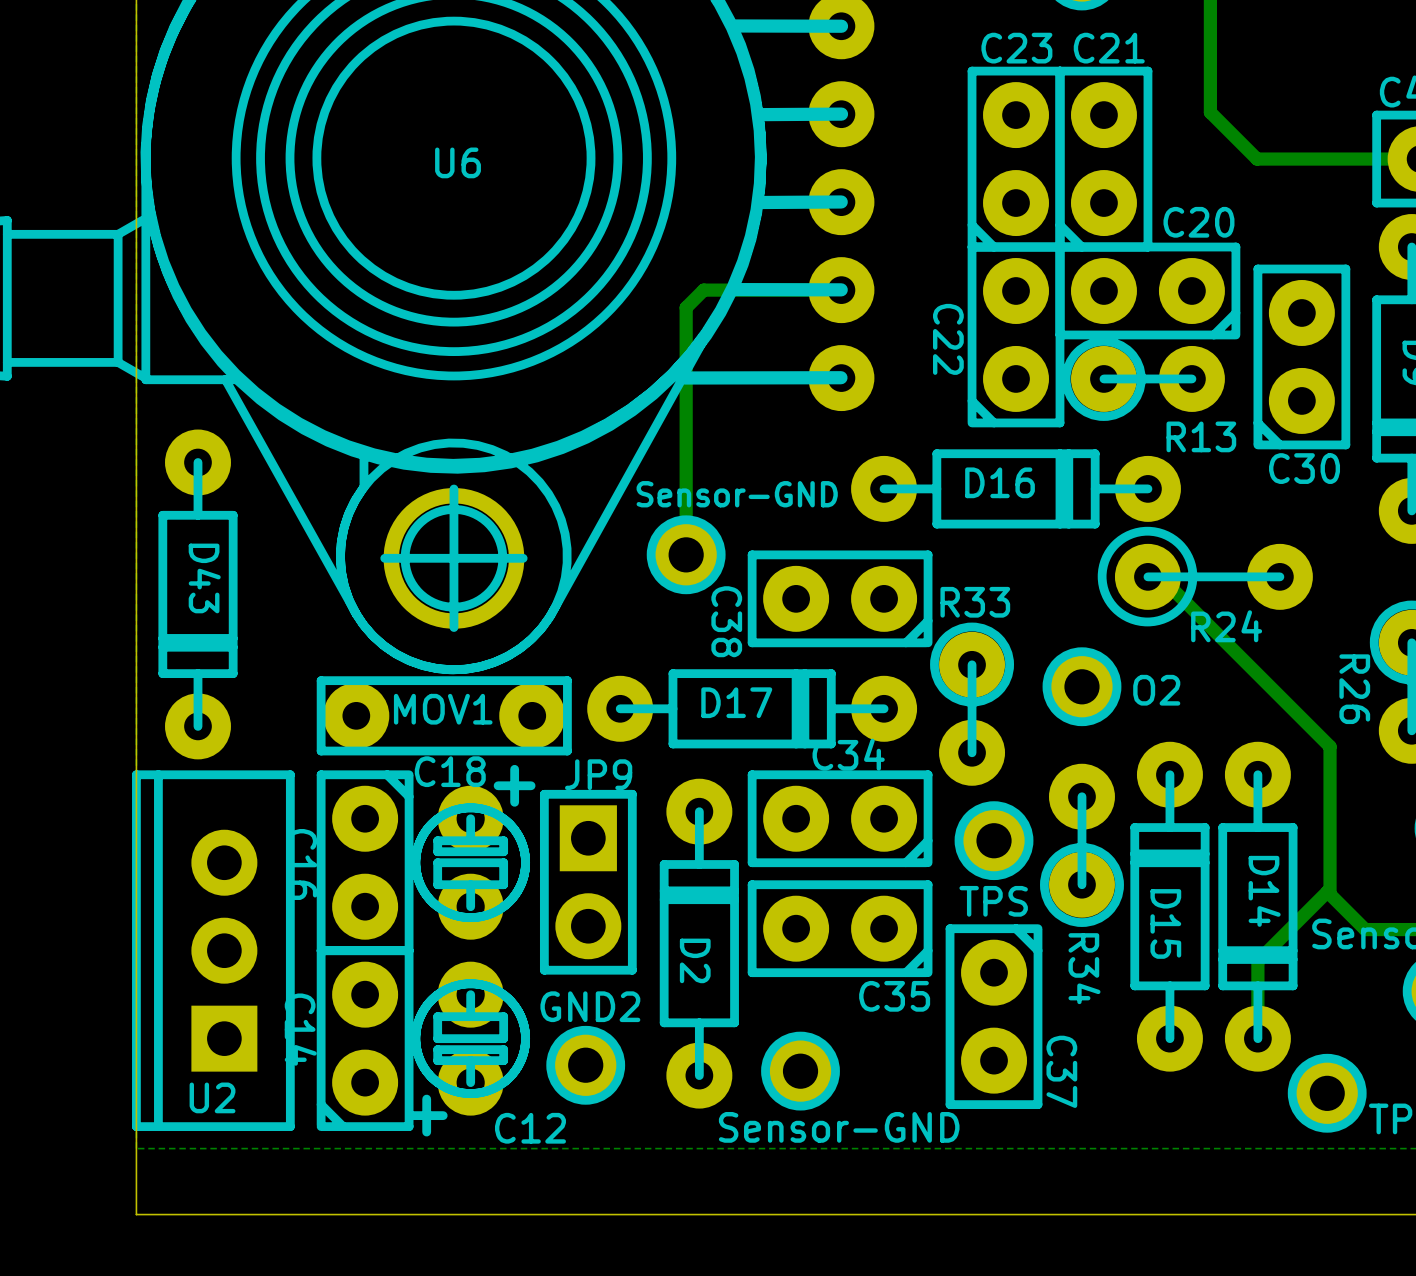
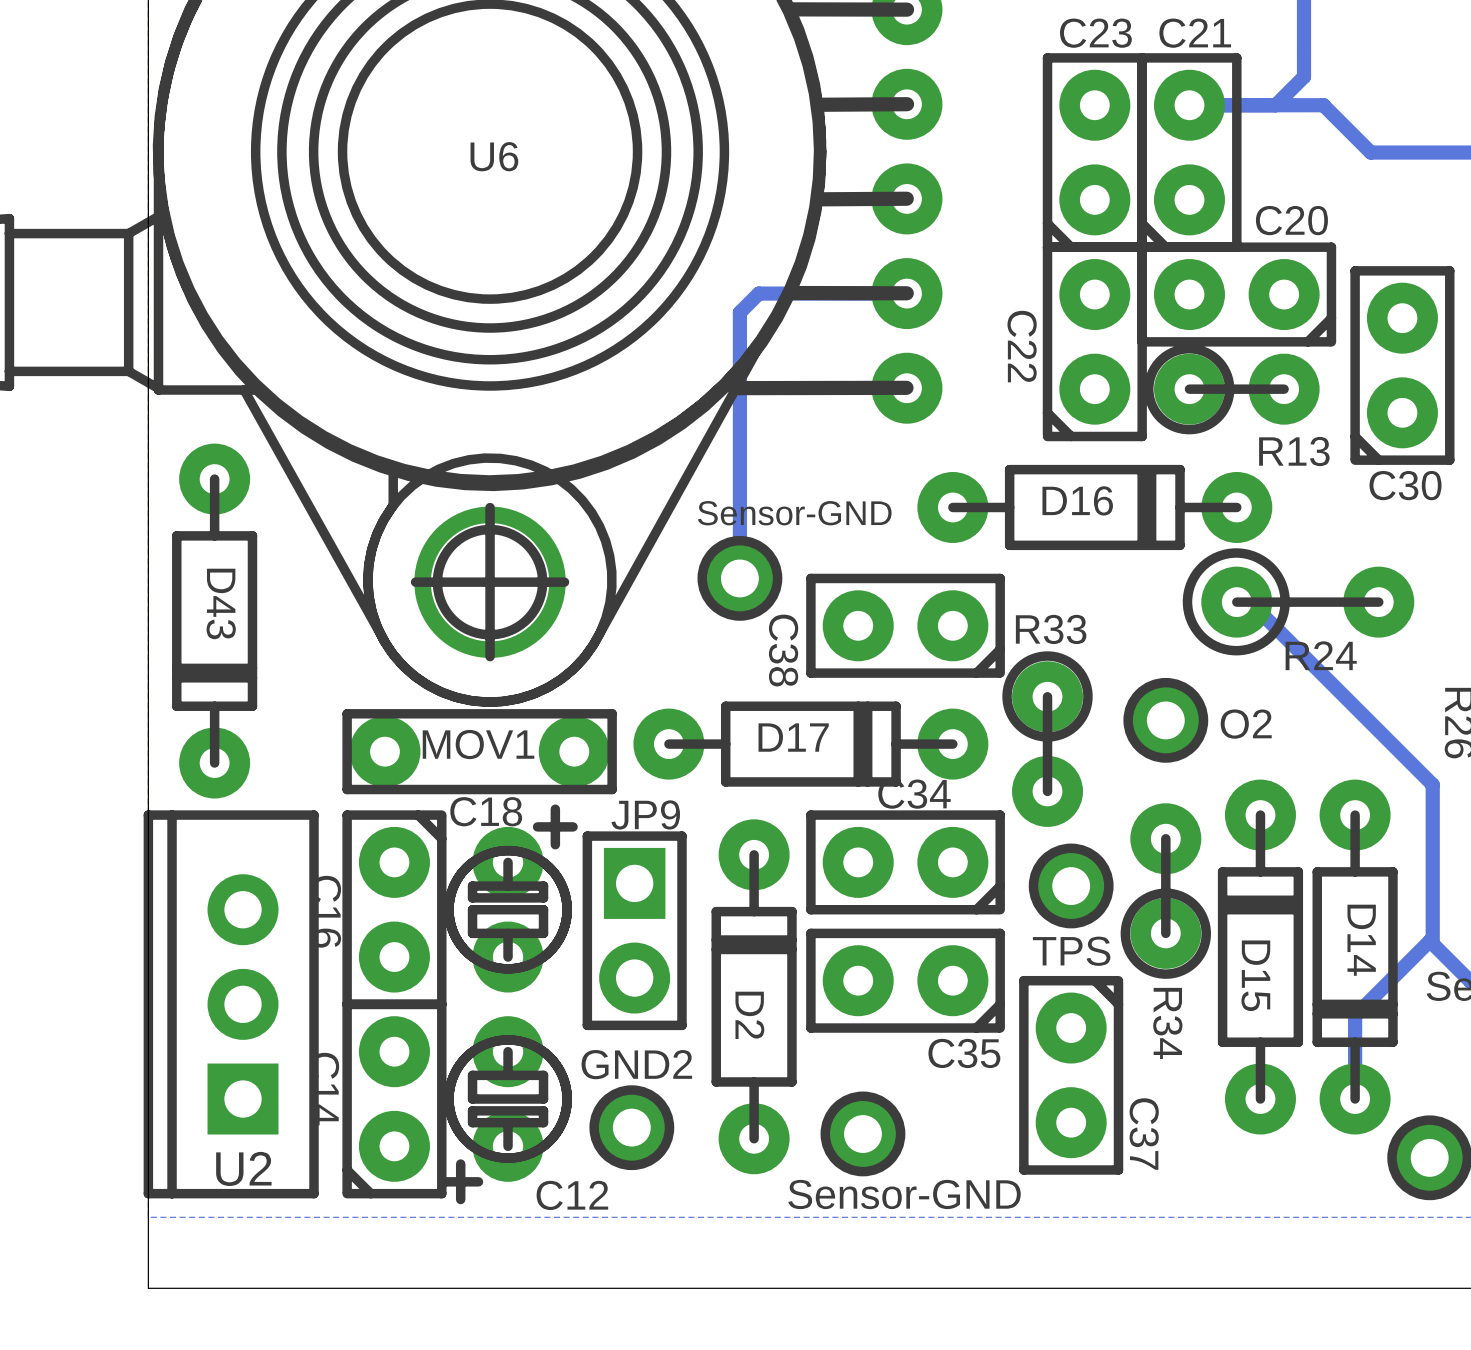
track: (1210, 88) (1210, 112) (1257, 159) (1272, 159) -> (1304, 76) (1275, 105)
track: none -> (1189, 105) (1323, 105) (1370, 152)
U2 name position: U2 (212, 1097) -> U2 (243, 1168)

